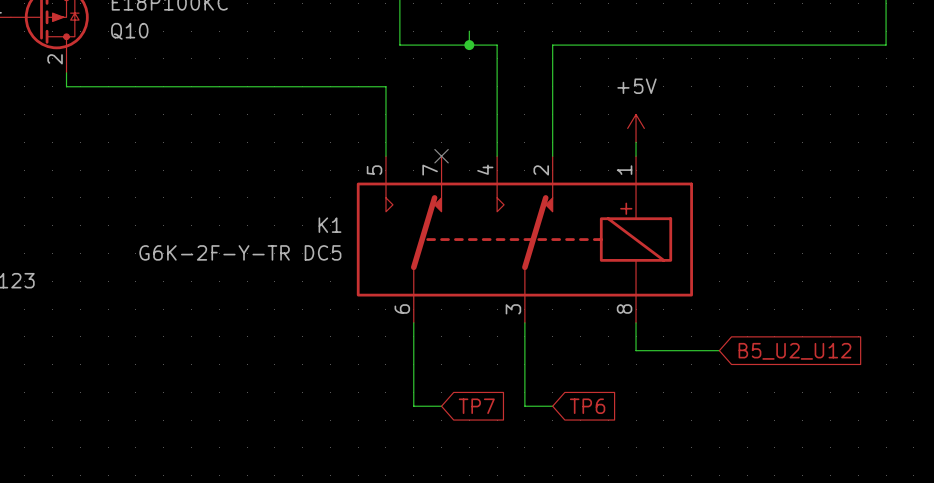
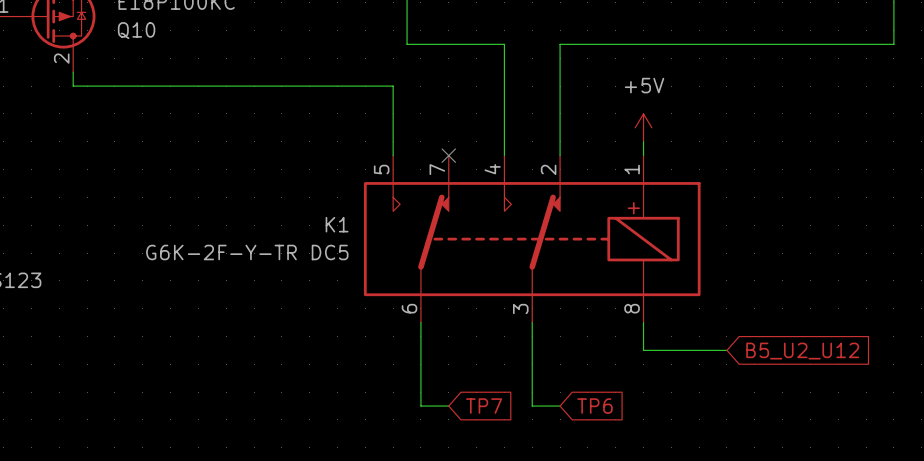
wire: (469, 31) (469, 45) -> none
junction: (469, 45) -> none

